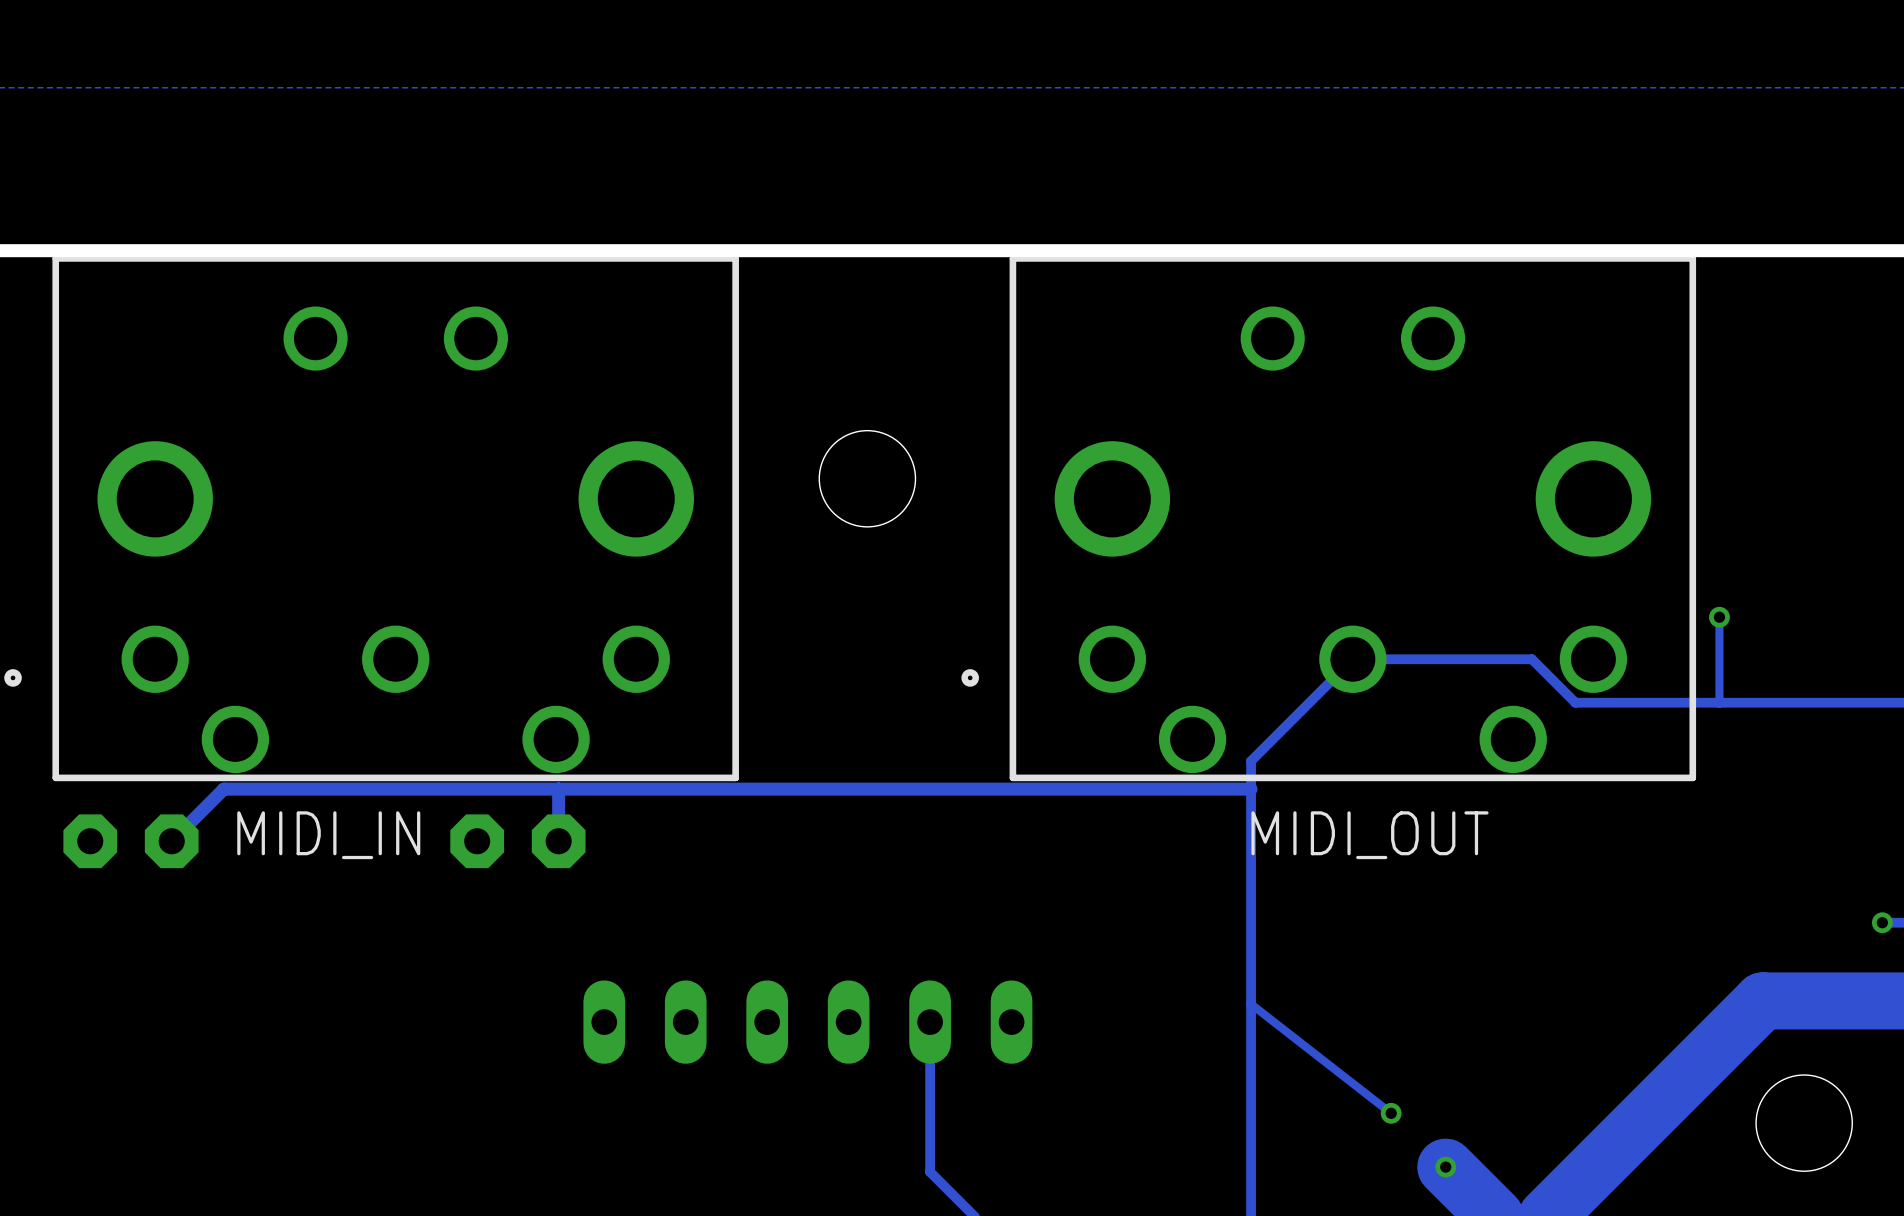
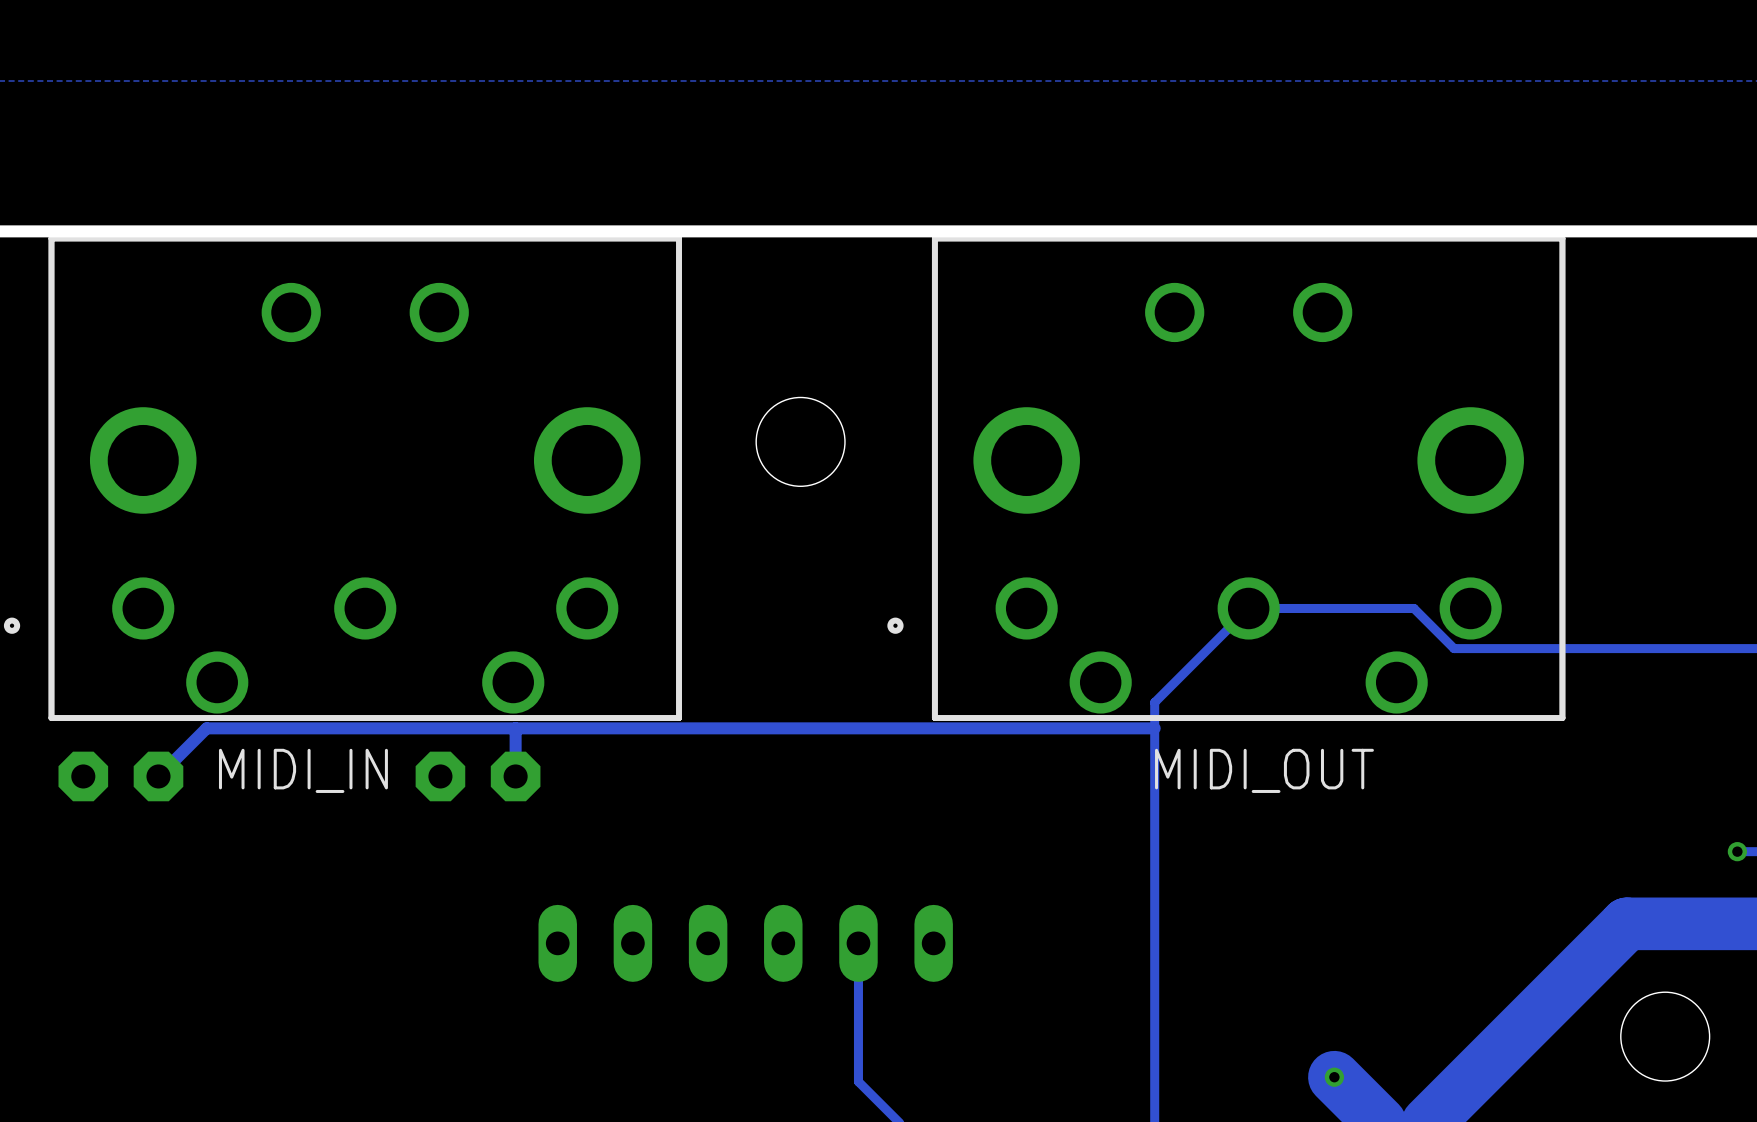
track: (1719, 617) (1719, 702) -> none
via: (1719, 617) -> none
track: (1251, 1004) (1391, 1113) -> none
via: (1391, 1113) -> none

